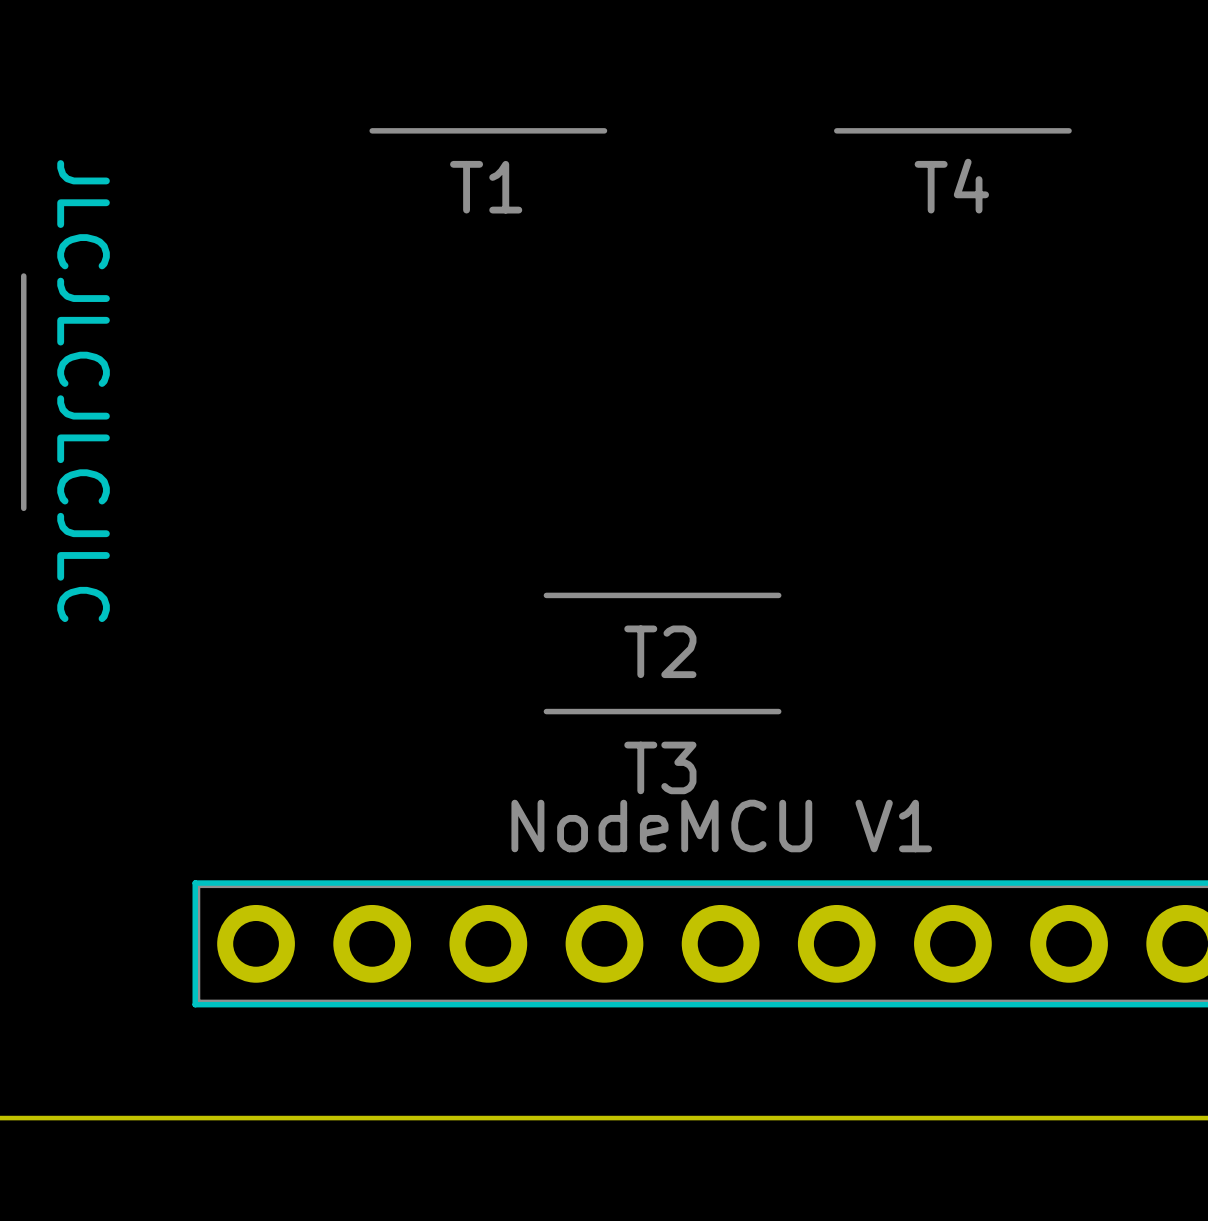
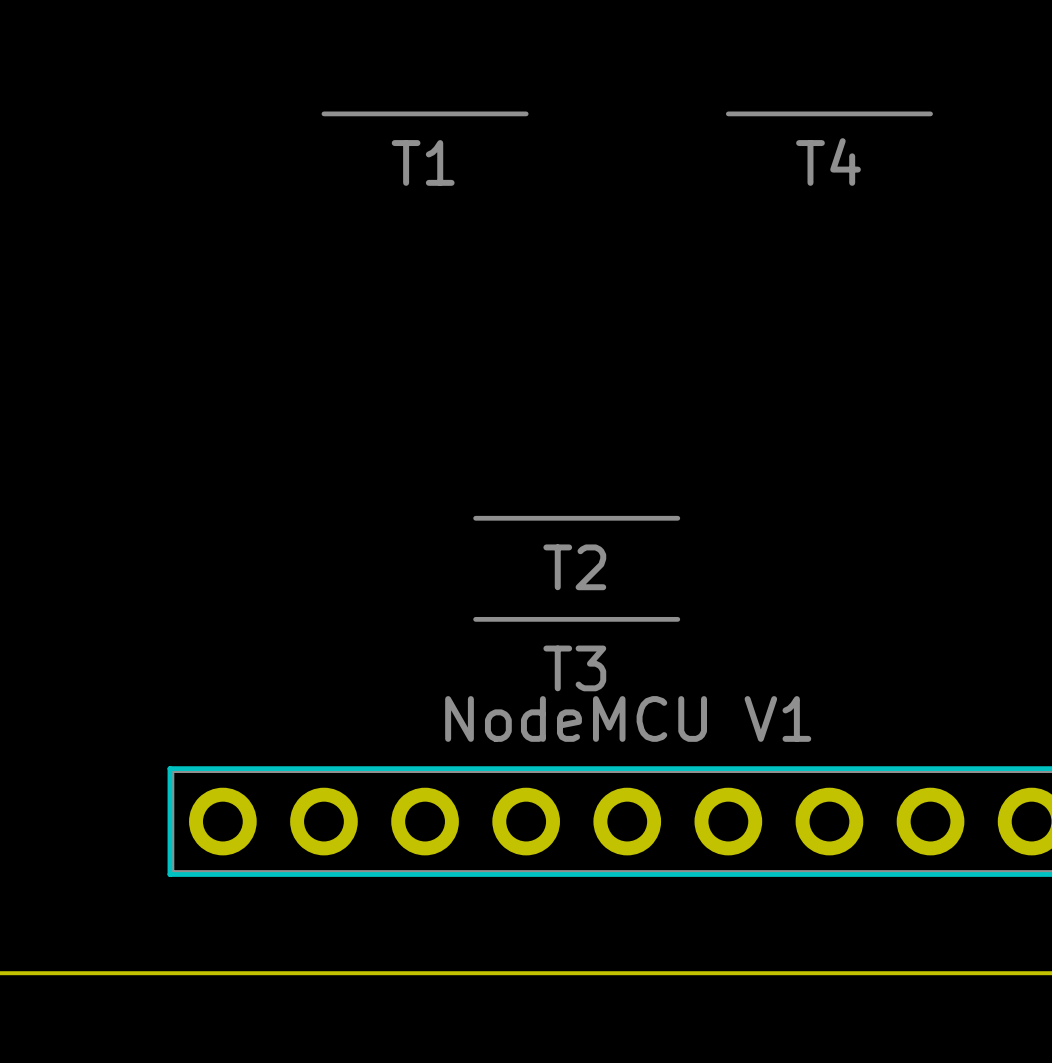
drawing: [21, 273, 27, 512] -> none

